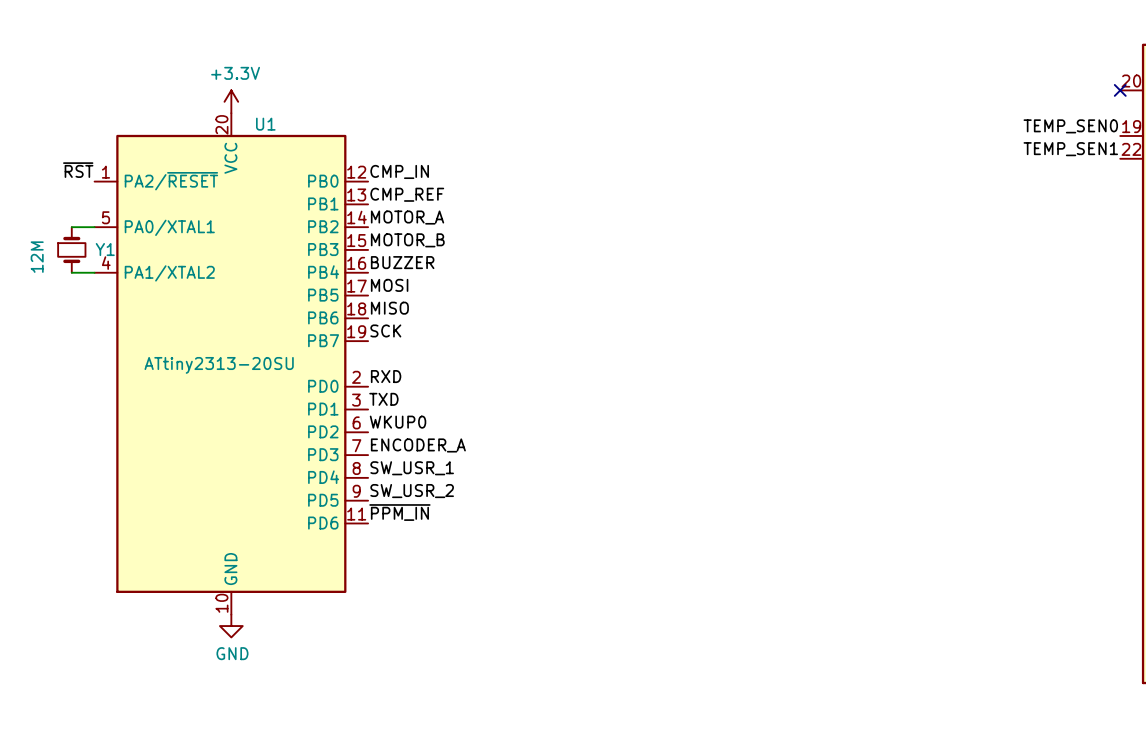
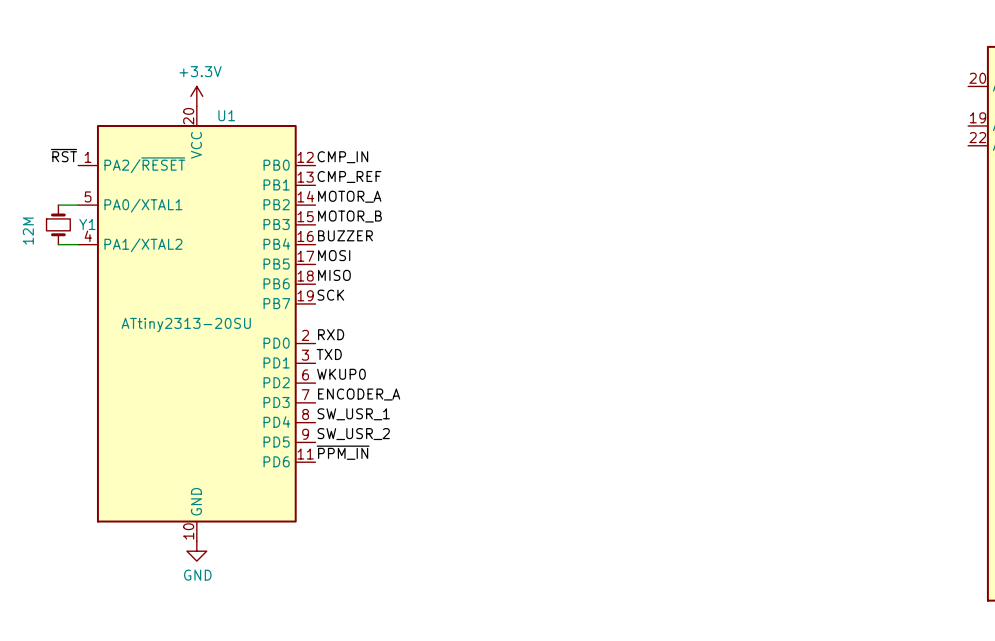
no-connect mark: (1120, 90) -> none
label: TEMP_SEN0 (1070, 126) -> none
label: TEMP_SEN1 (1070, 149) -> none

